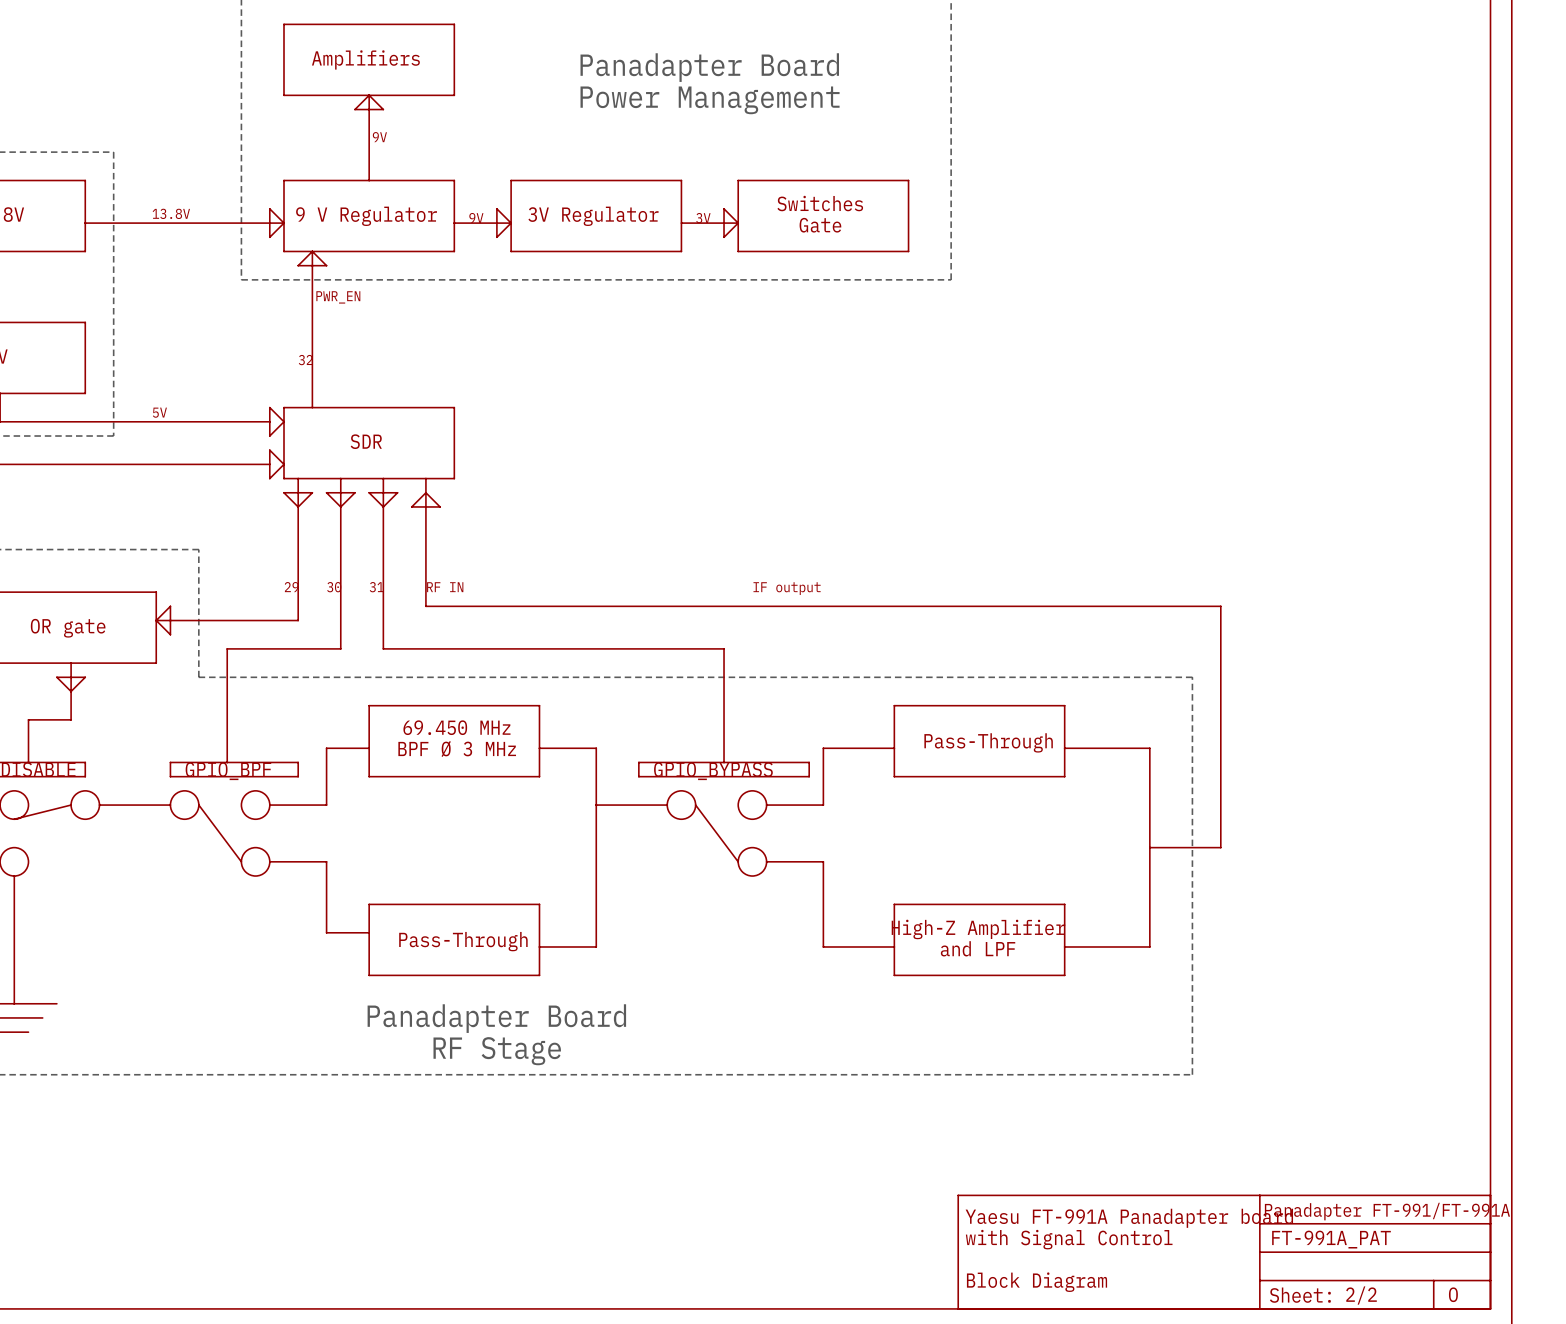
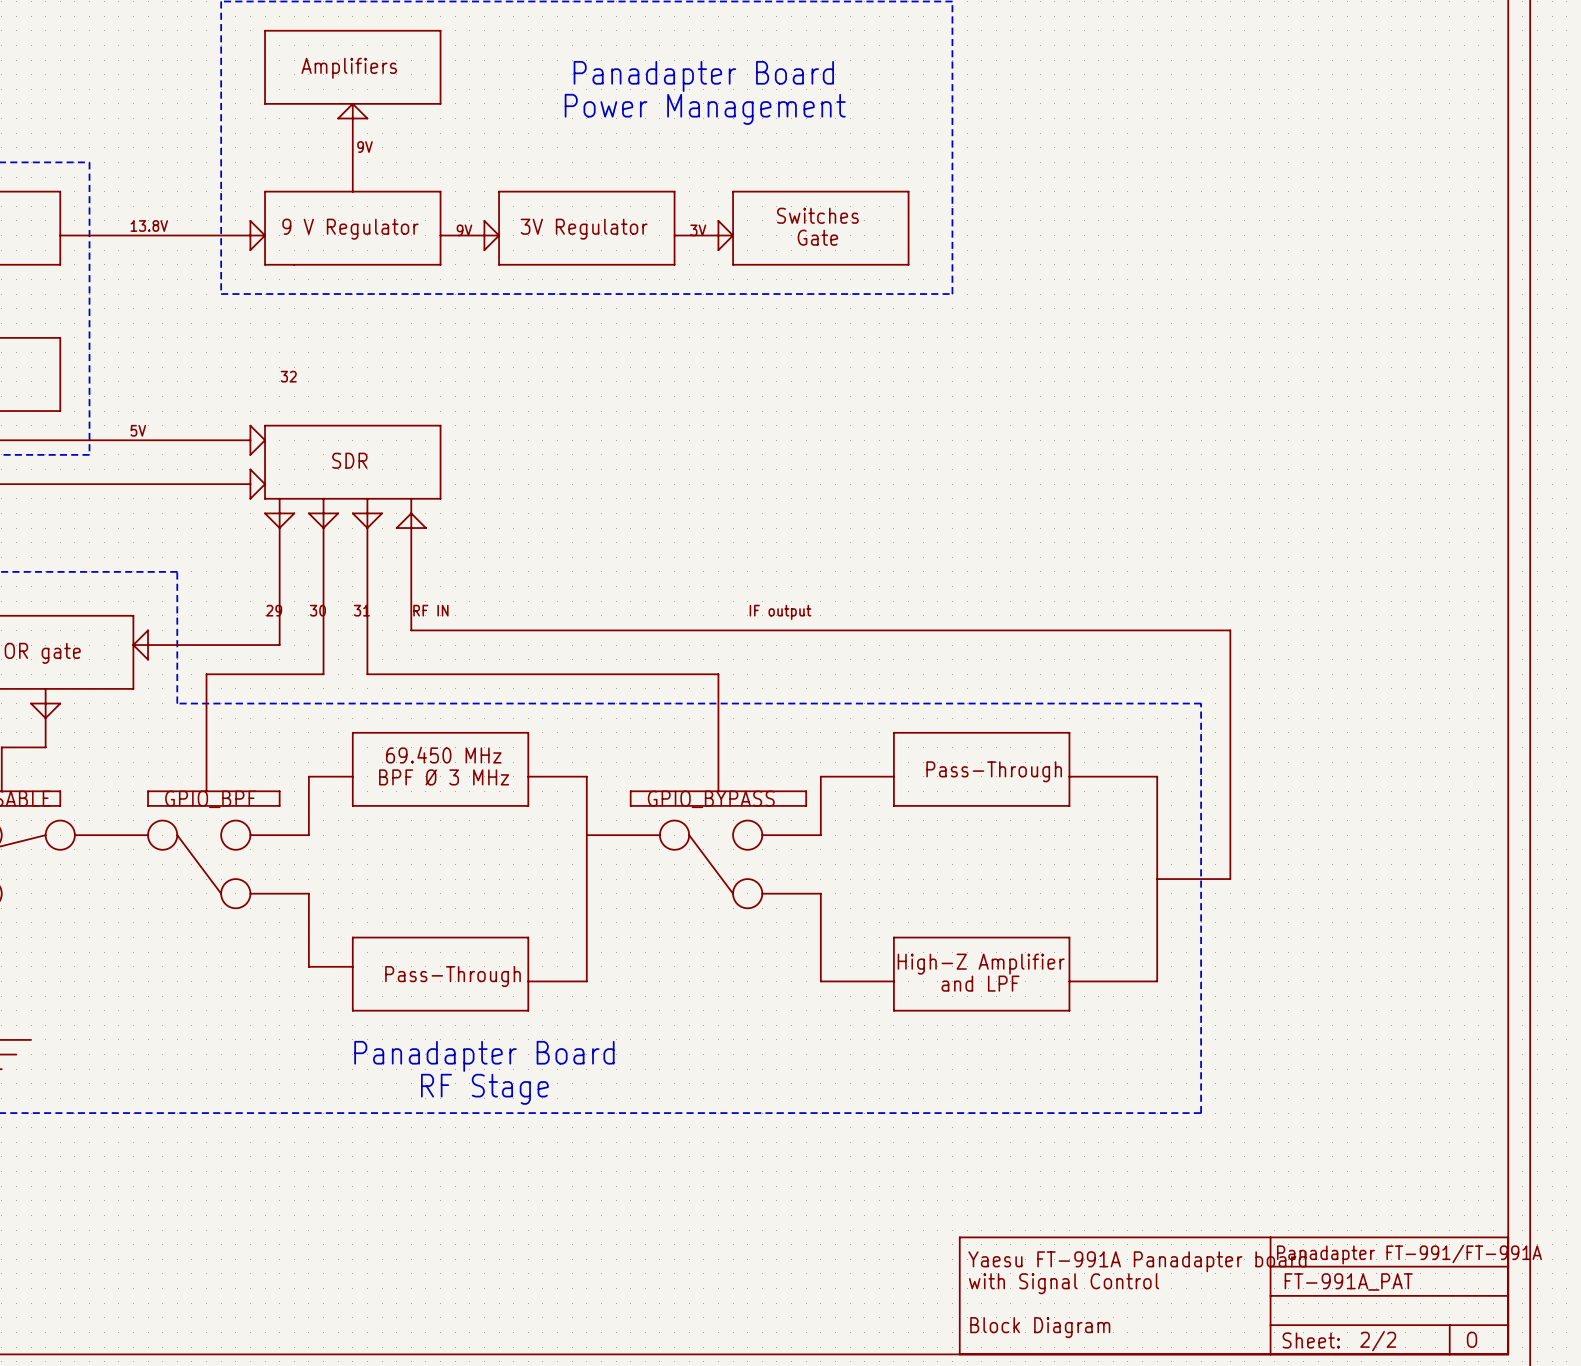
line: (312, 251) (312, 407) -> none
line: (312, 251) (326, 265) (298, 265) (312, 251) -> none
text: PWR_EN (338, 297) -> none

